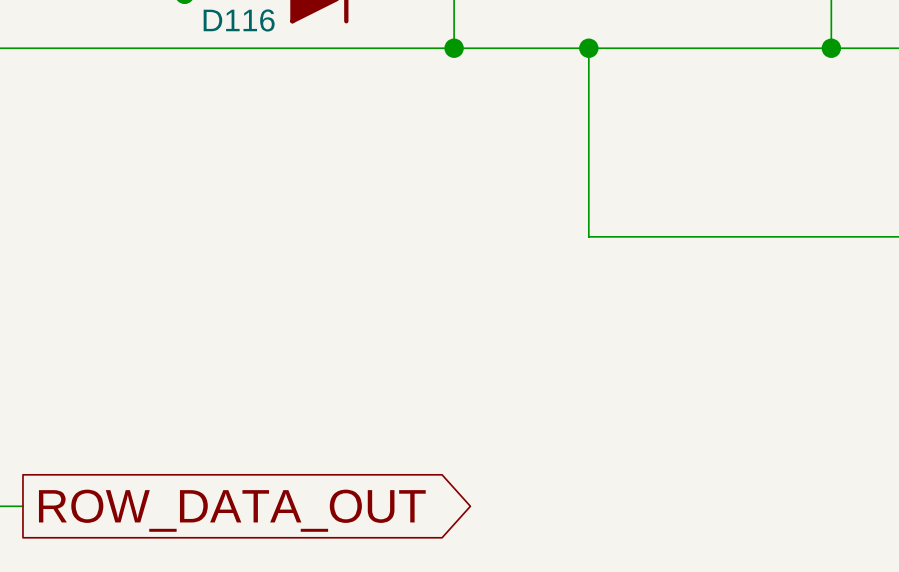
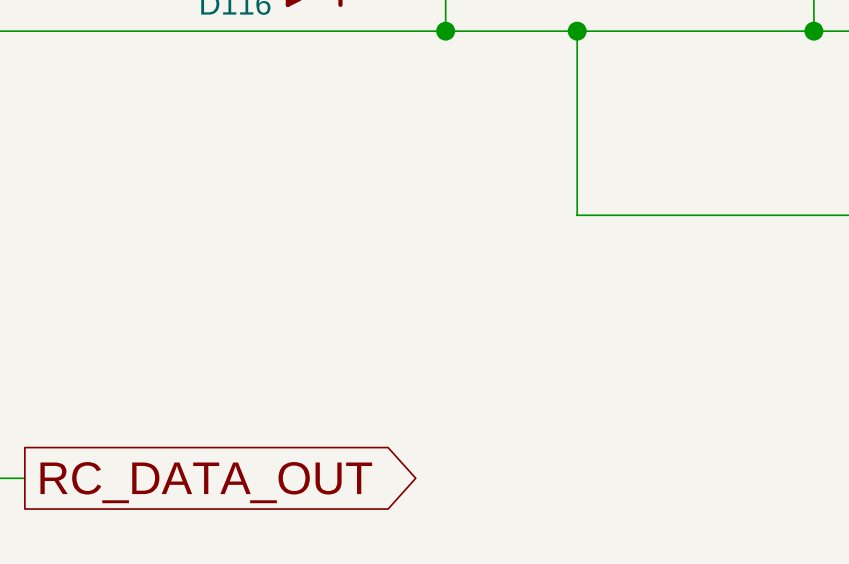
global label: ROW_DATA_OUT (232, 510) -> RC_DATA_OUT (206, 482)

